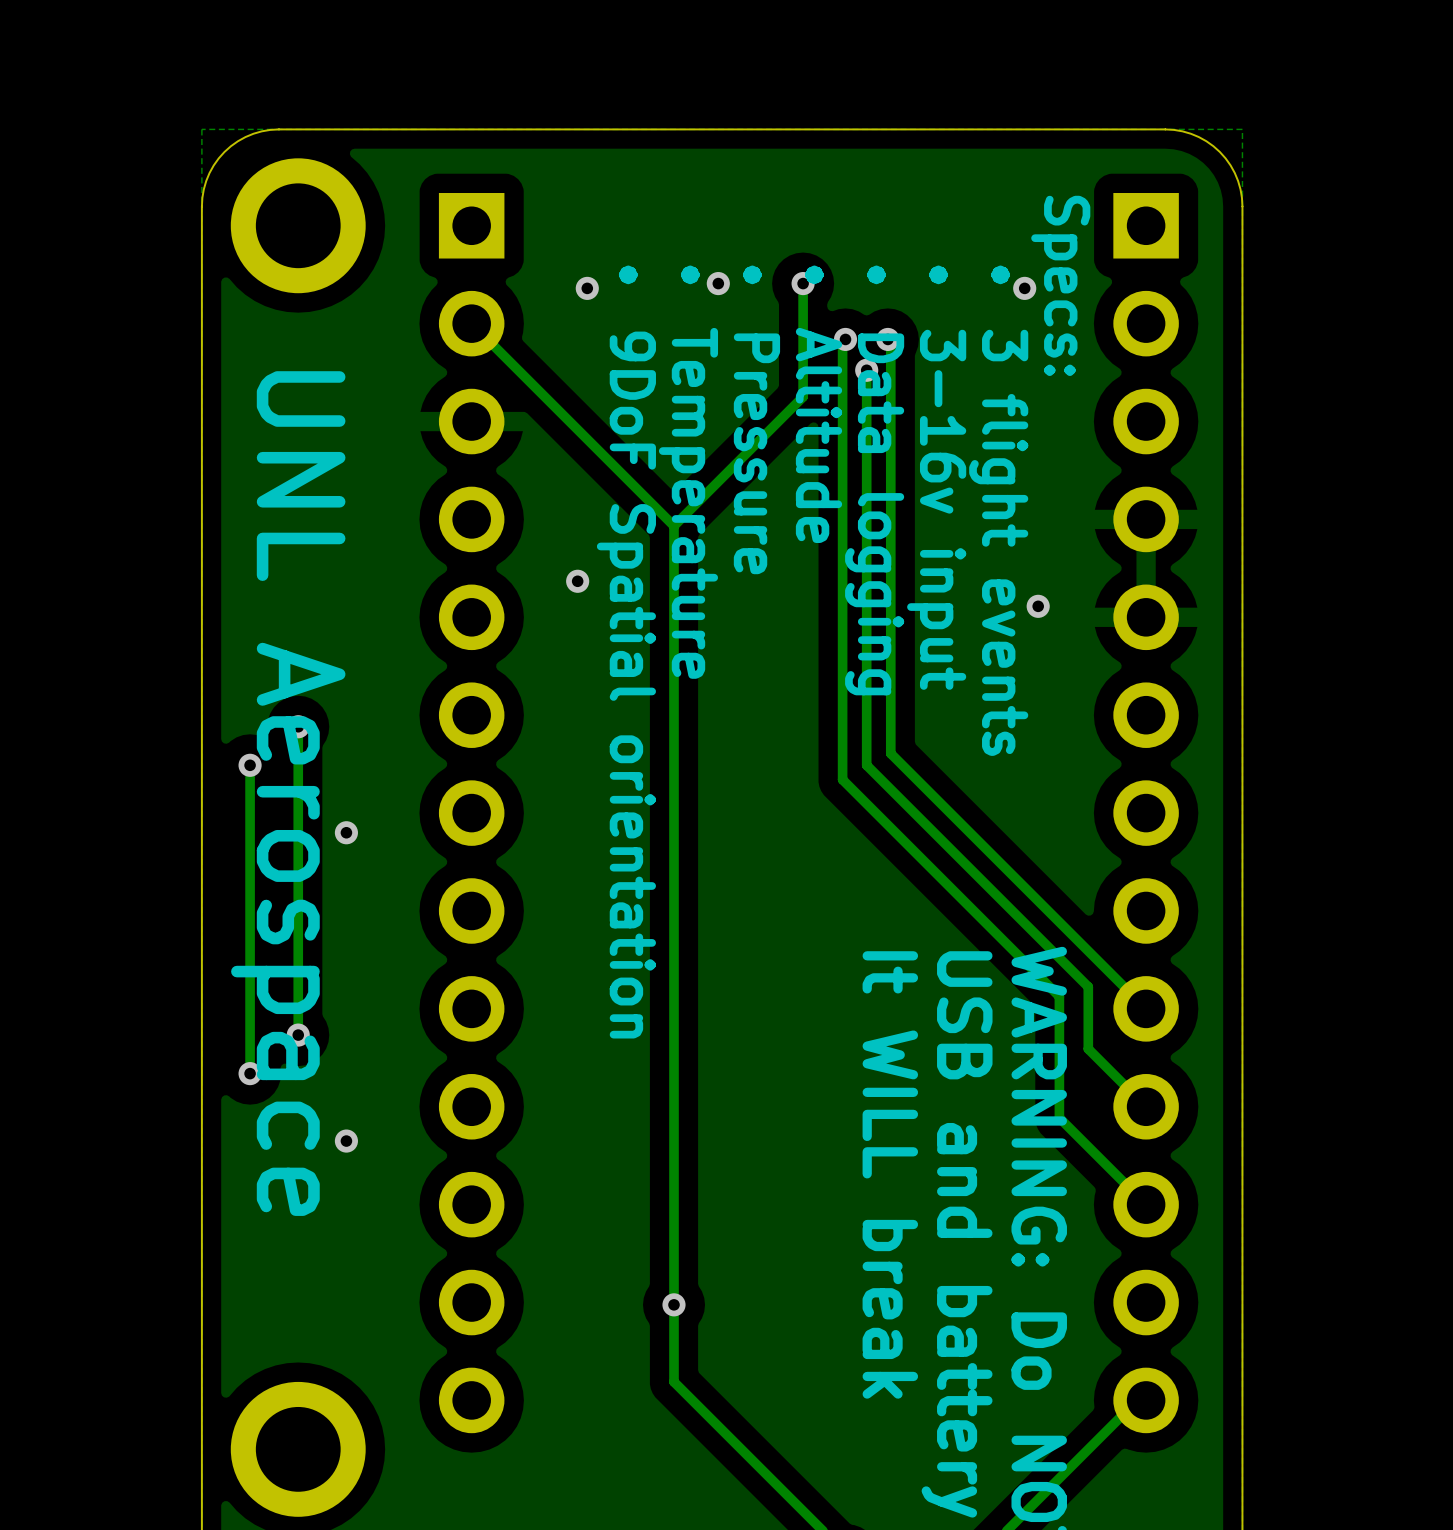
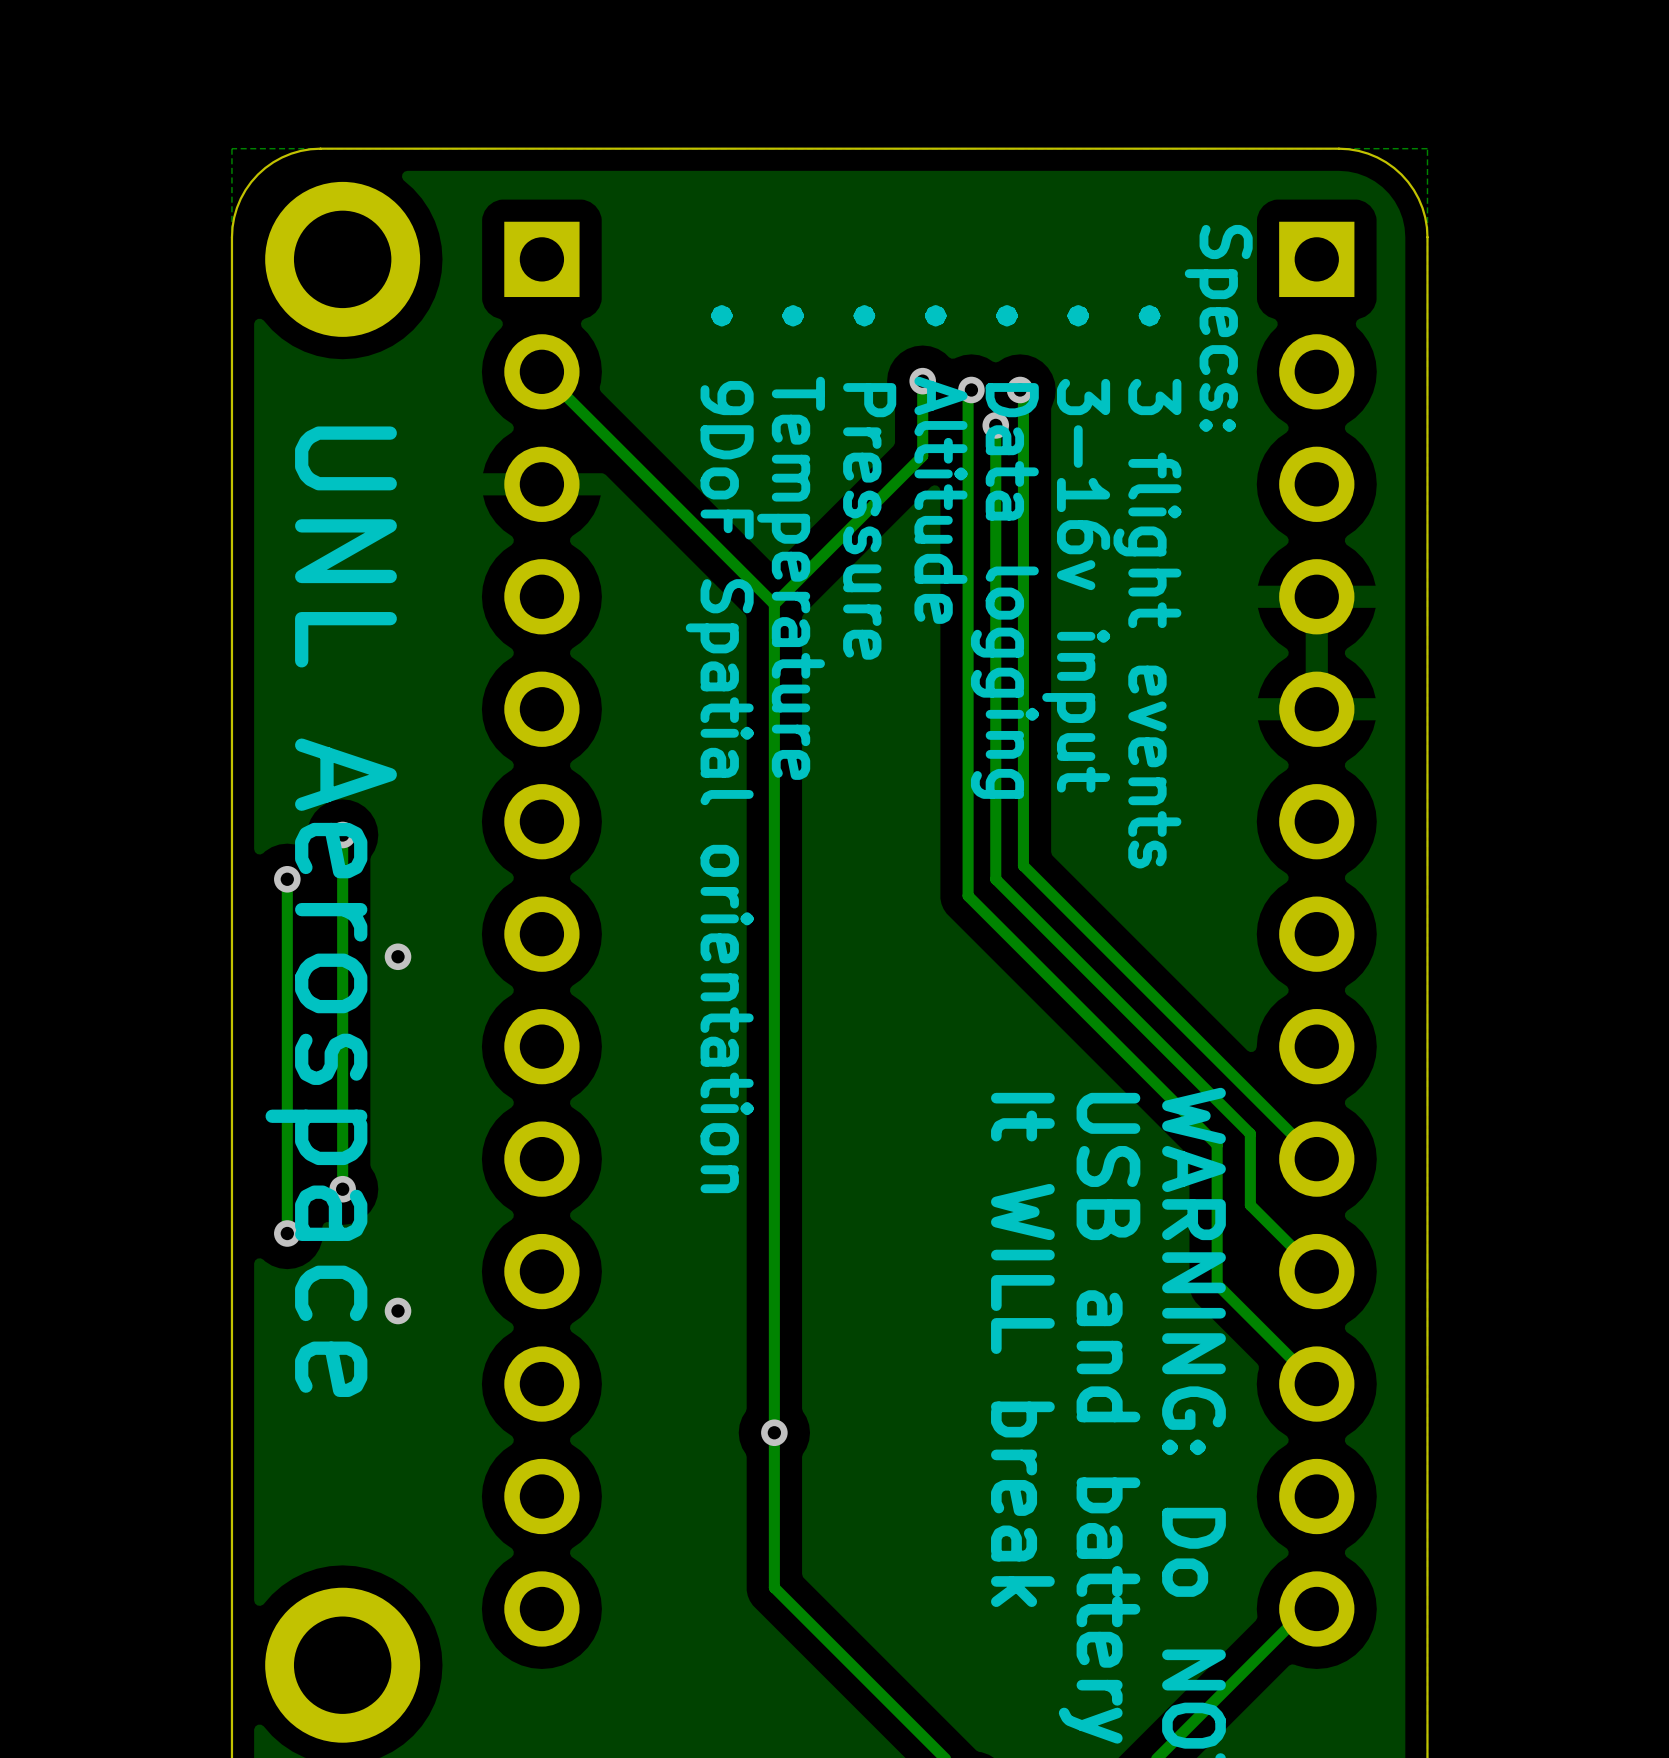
via: (718, 283) -> none
track: (803, 283) (803, 331) -> none
via position: (803, 283) -> (922, 381)
via: (587, 288) -> none
via: (1024, 288) -> none
via: (577, 581) -> none
via: (1038, 606) -> none
via position: (674, 1304) -> (774, 1432)

